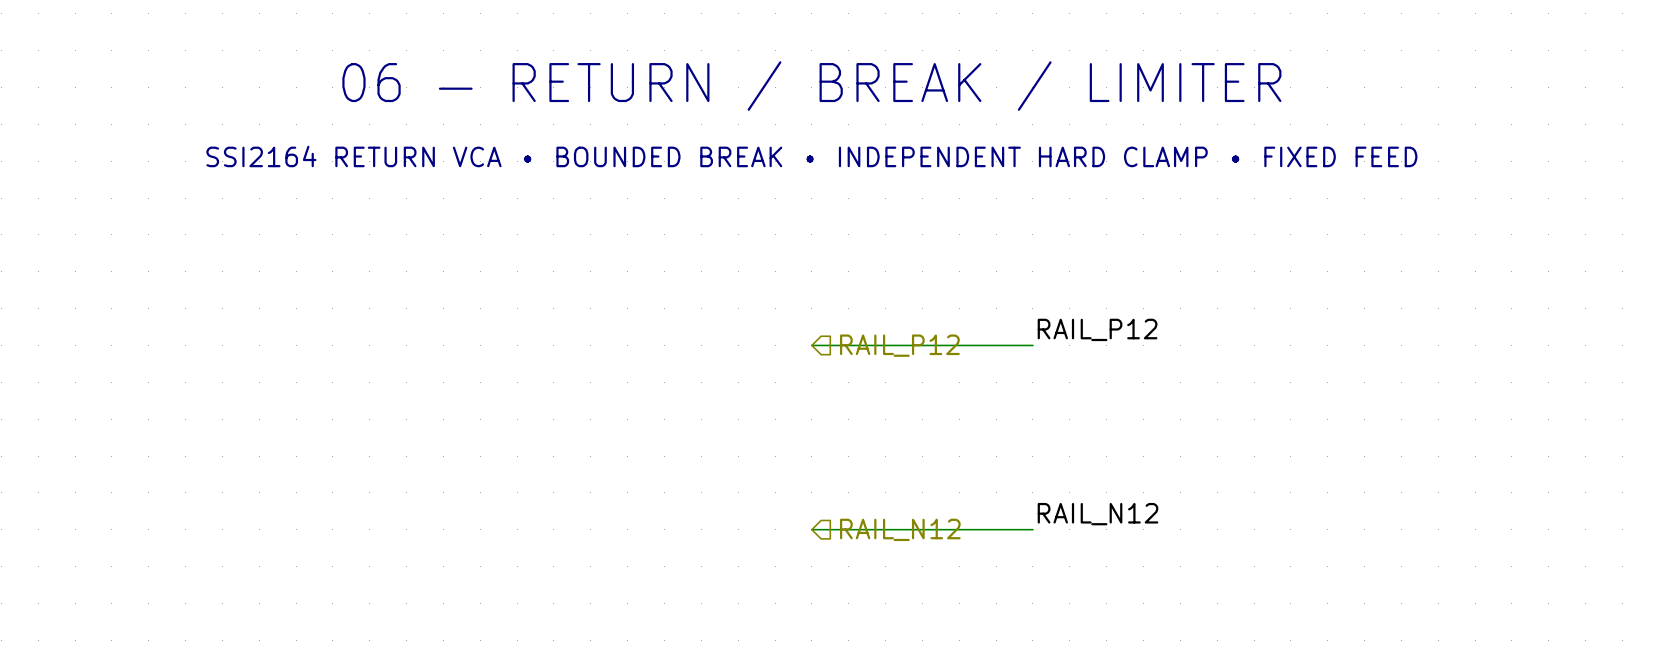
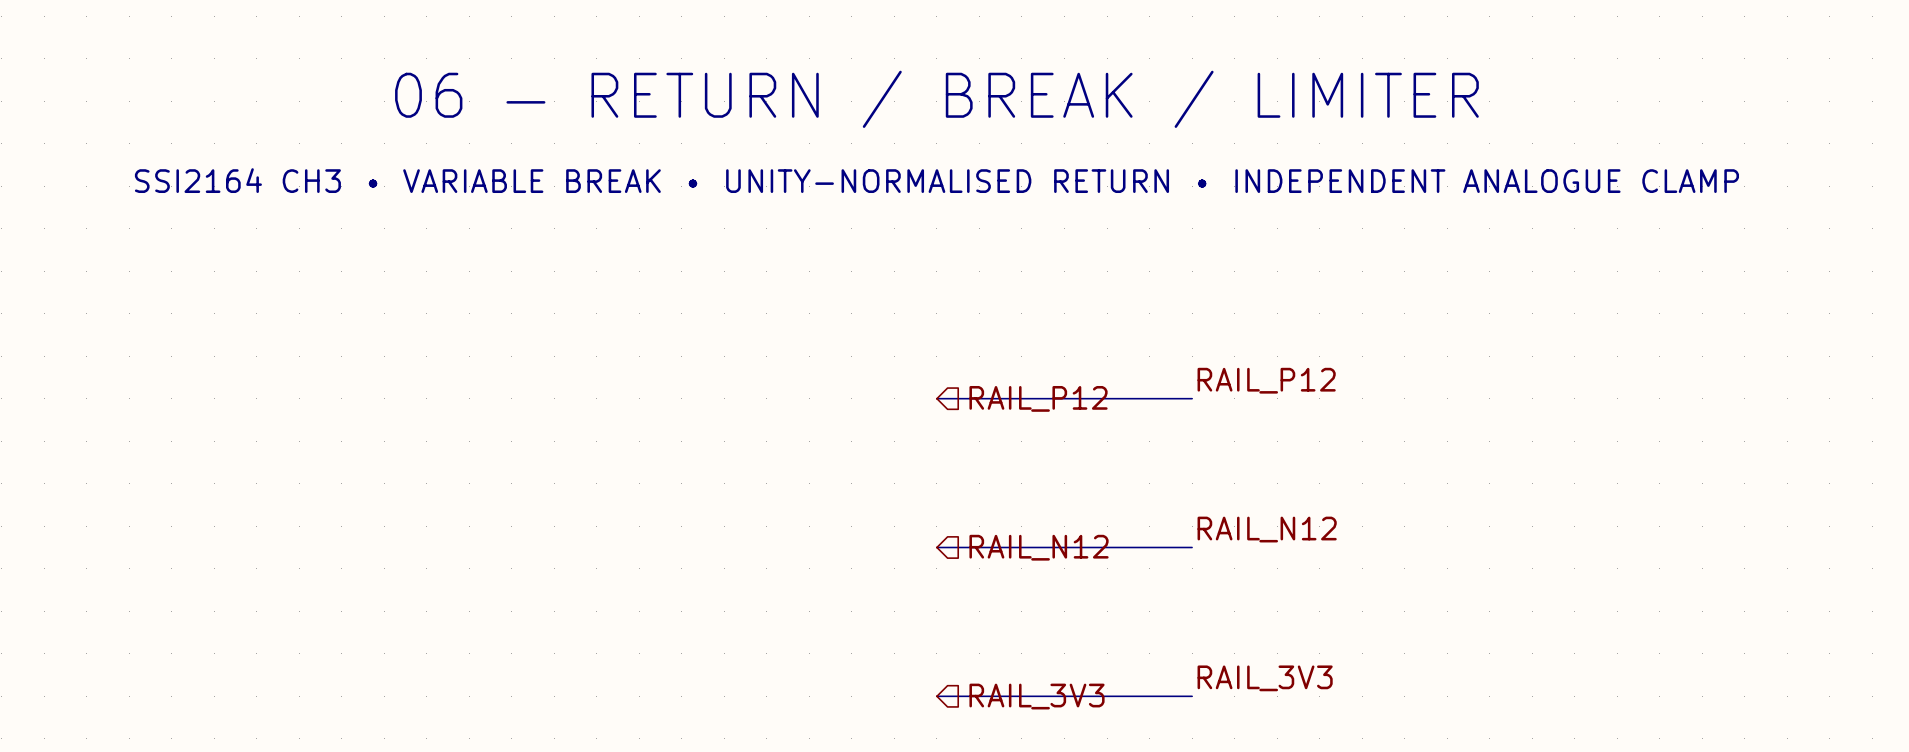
text: SSI2164 RETURN VCA • BOUNDED BREAK • INDEPENDENT HARD CLAMP • FIXED FEED (811, 156) -> SSI2164 CH3 • VARIABLE BREAK • UNITY-NORMALISED RETURN • INDEPENDENT ANALOGUE CLAMP (936, 180)
label position: RAIL_N12 (1098, 514) -> RAIL_N12 (1267, 529)
wire: (811, 529) (1032, 529) -> (936, 547) (1192, 547)
hierarchical label position: RAIL_N12 (900, 529) -> RAIL_N12 (1039, 547)
label: none -> RAIL_3V3 (1265, 678)
wire: none -> (936, 696) (1192, 696)
hierarchical label: none -> RAIL_3V3 (1037, 696)

